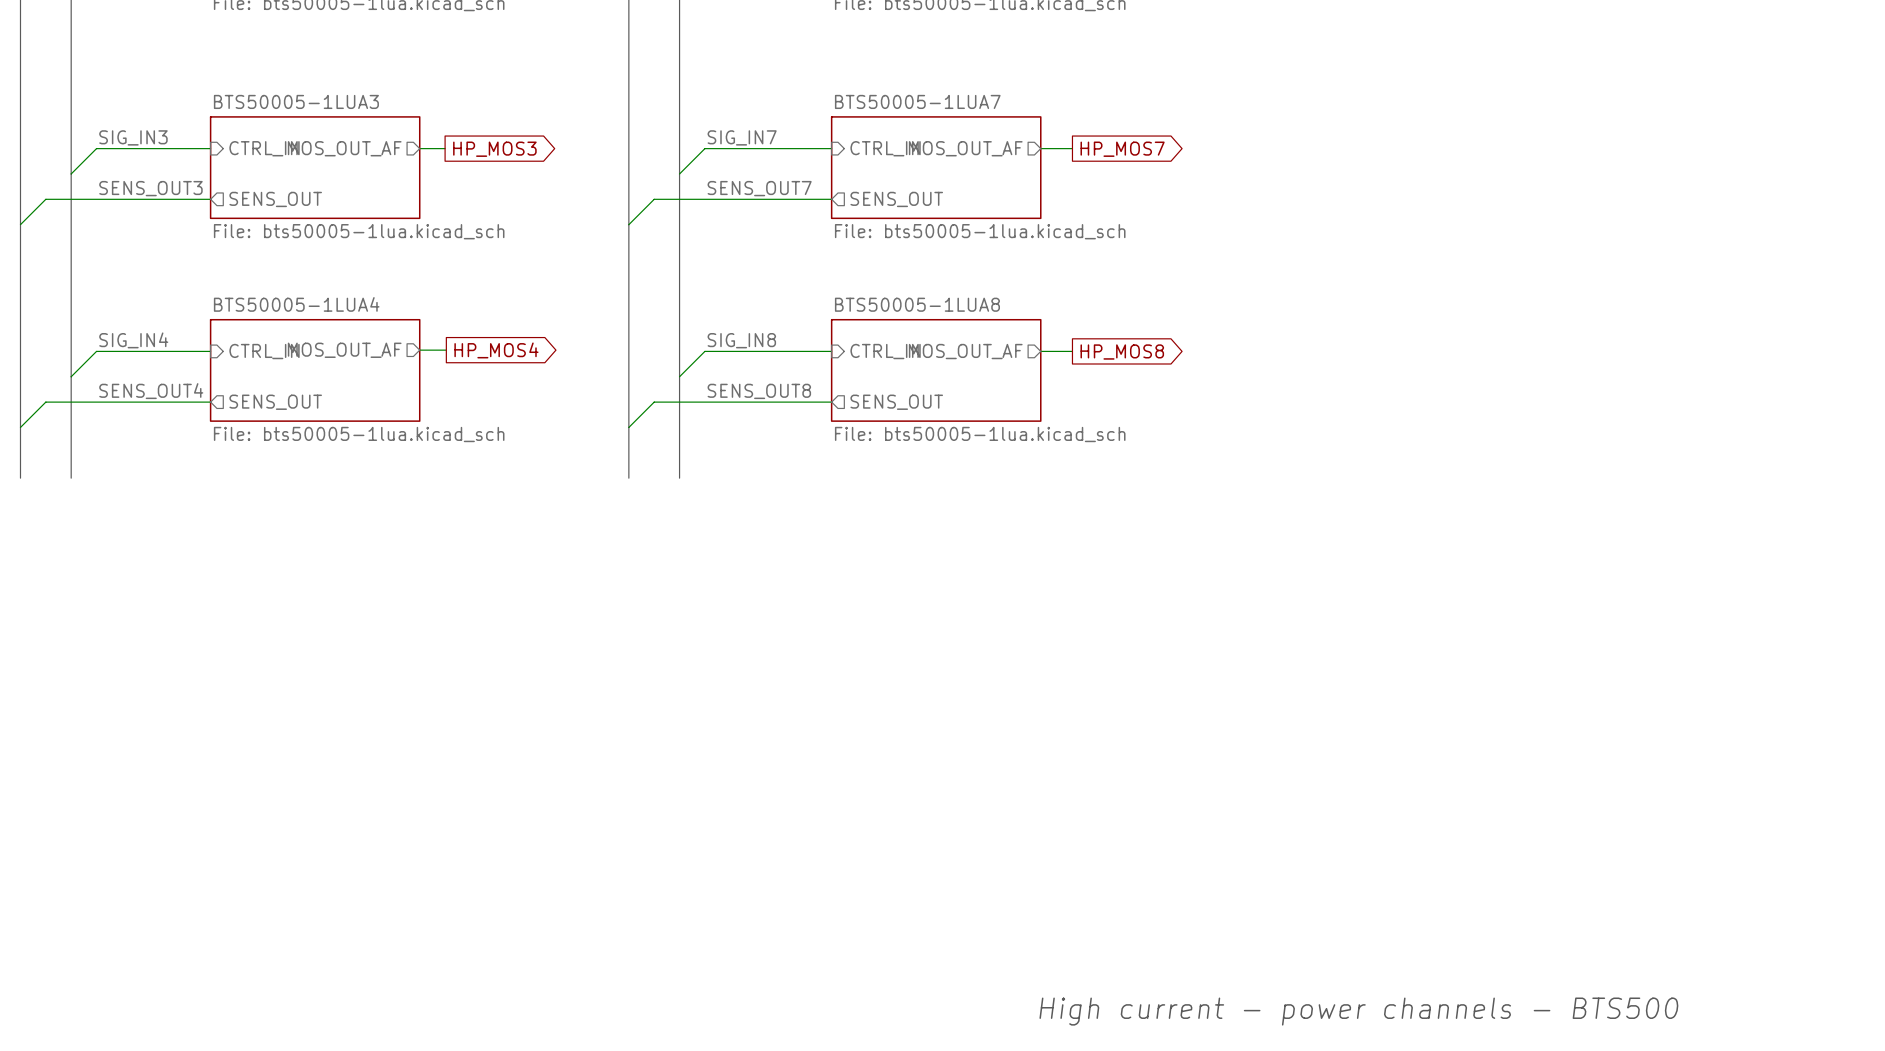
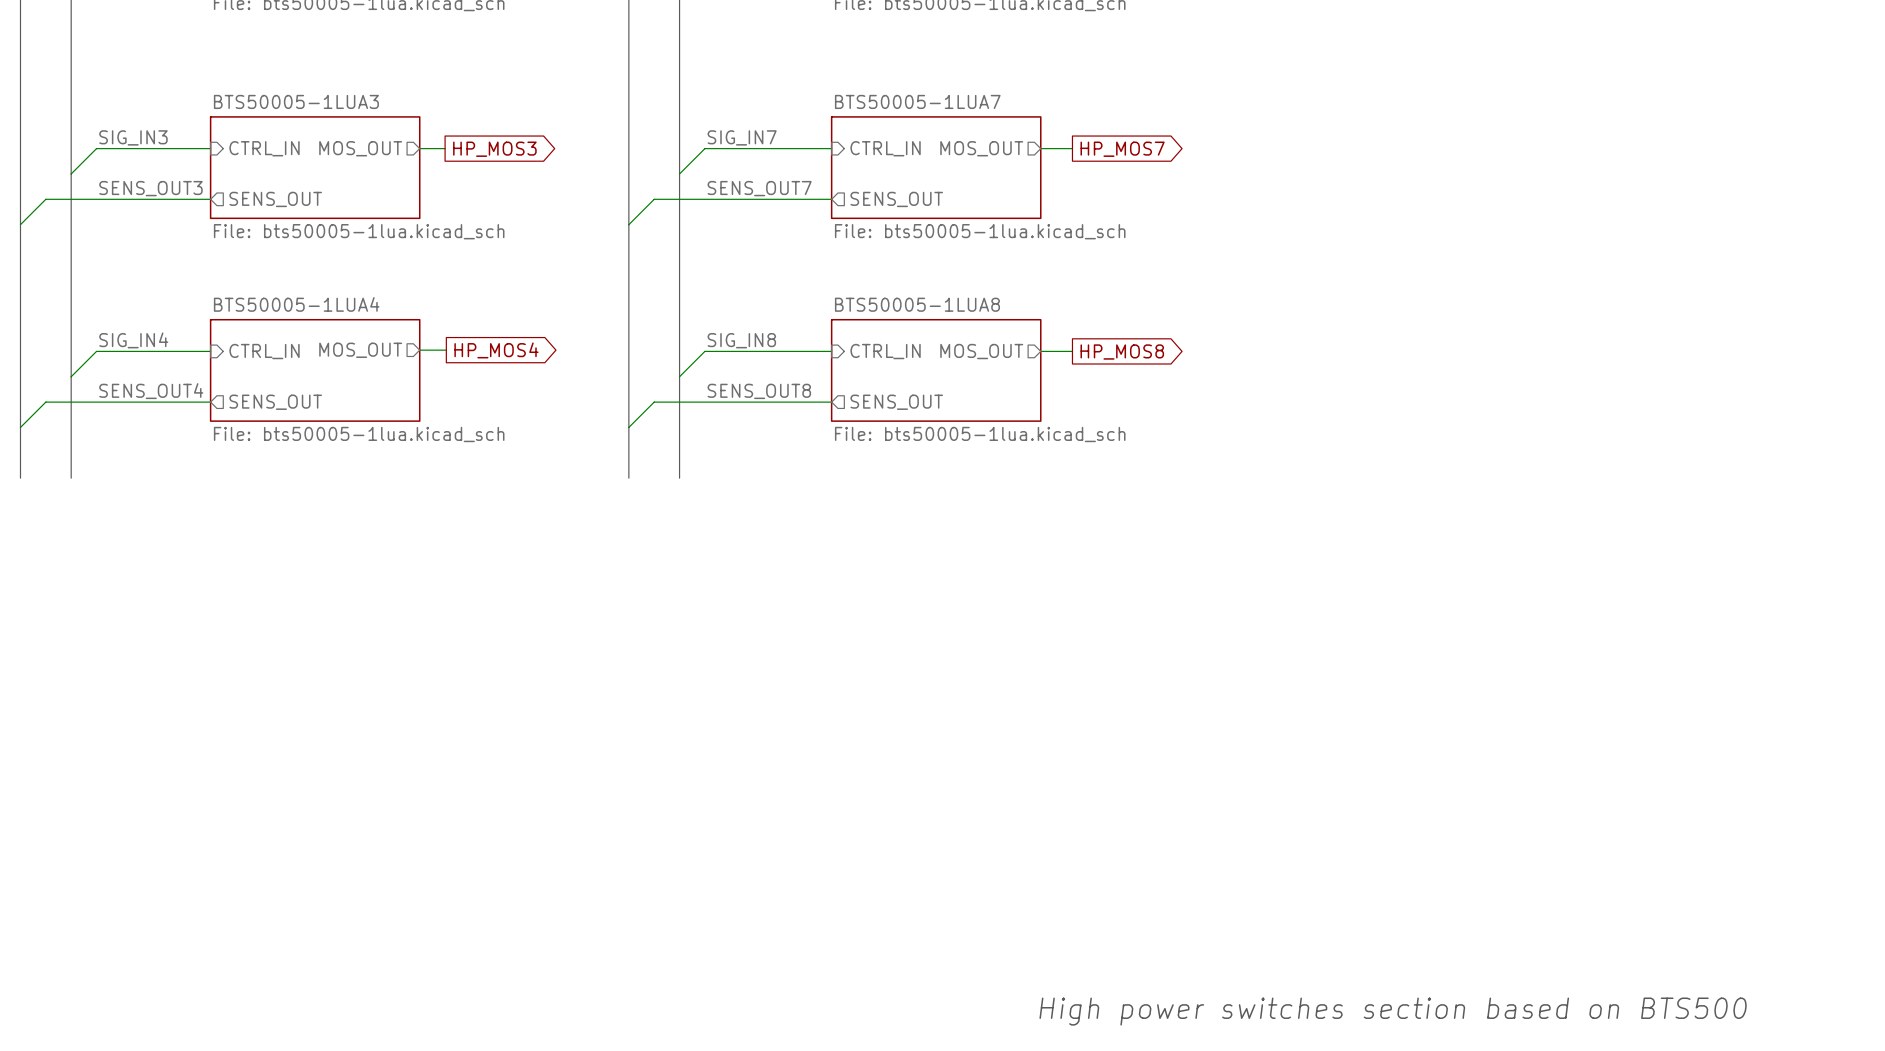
sheet pin: MOS_OUT_AF (344, 148) -> MOS_OUT (360, 148)
sheet pin: MOS_OUT_AF (965, 148) -> MOS_OUT (981, 148)
sheet pin: MOS_OUT_AF (344, 350) -> MOS_OUT (360, 350)
sheet pin: MOS_OUT_AF (965, 351) -> MOS_OUT (981, 351)
text: High current - power channels - BTS500 (1358, 1011) -> High power switches section based on BTS500 (1393, 1011)

